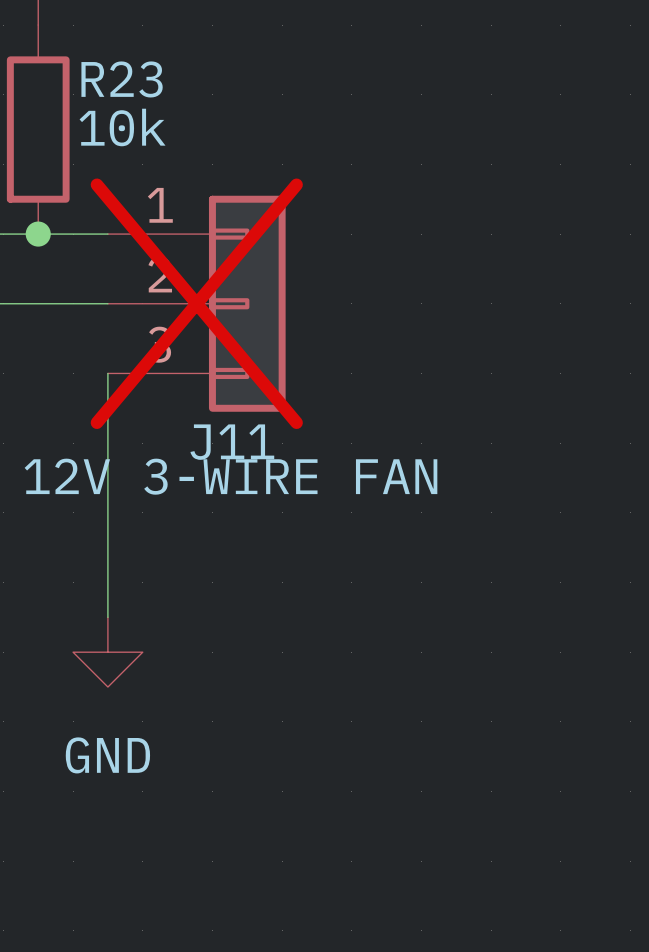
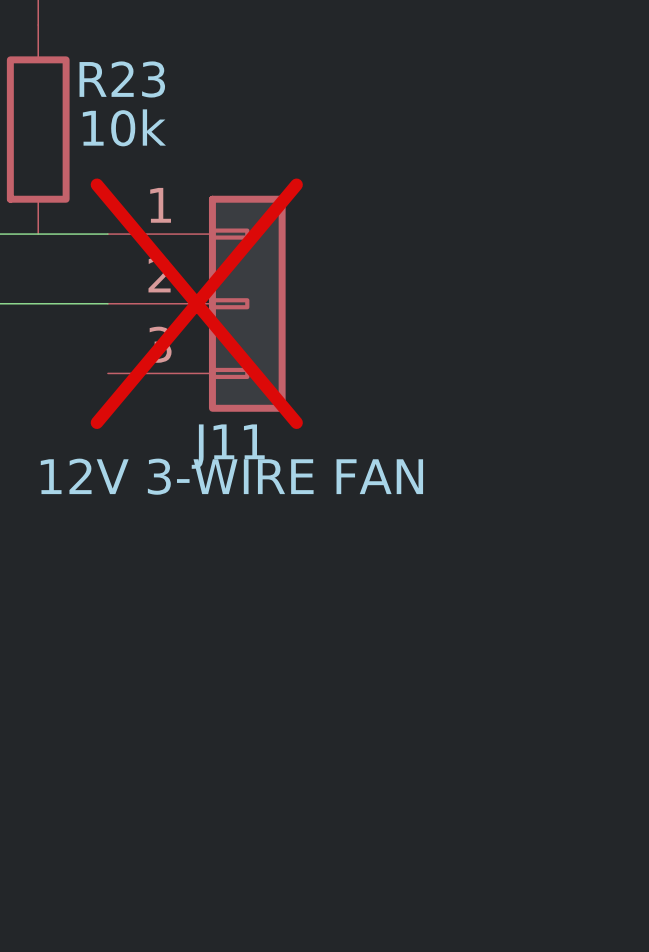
junction: (38, 234) -> none
wire: (107, 373) (107, 617) -> none
power symbol: GND (107, 652) -> none

